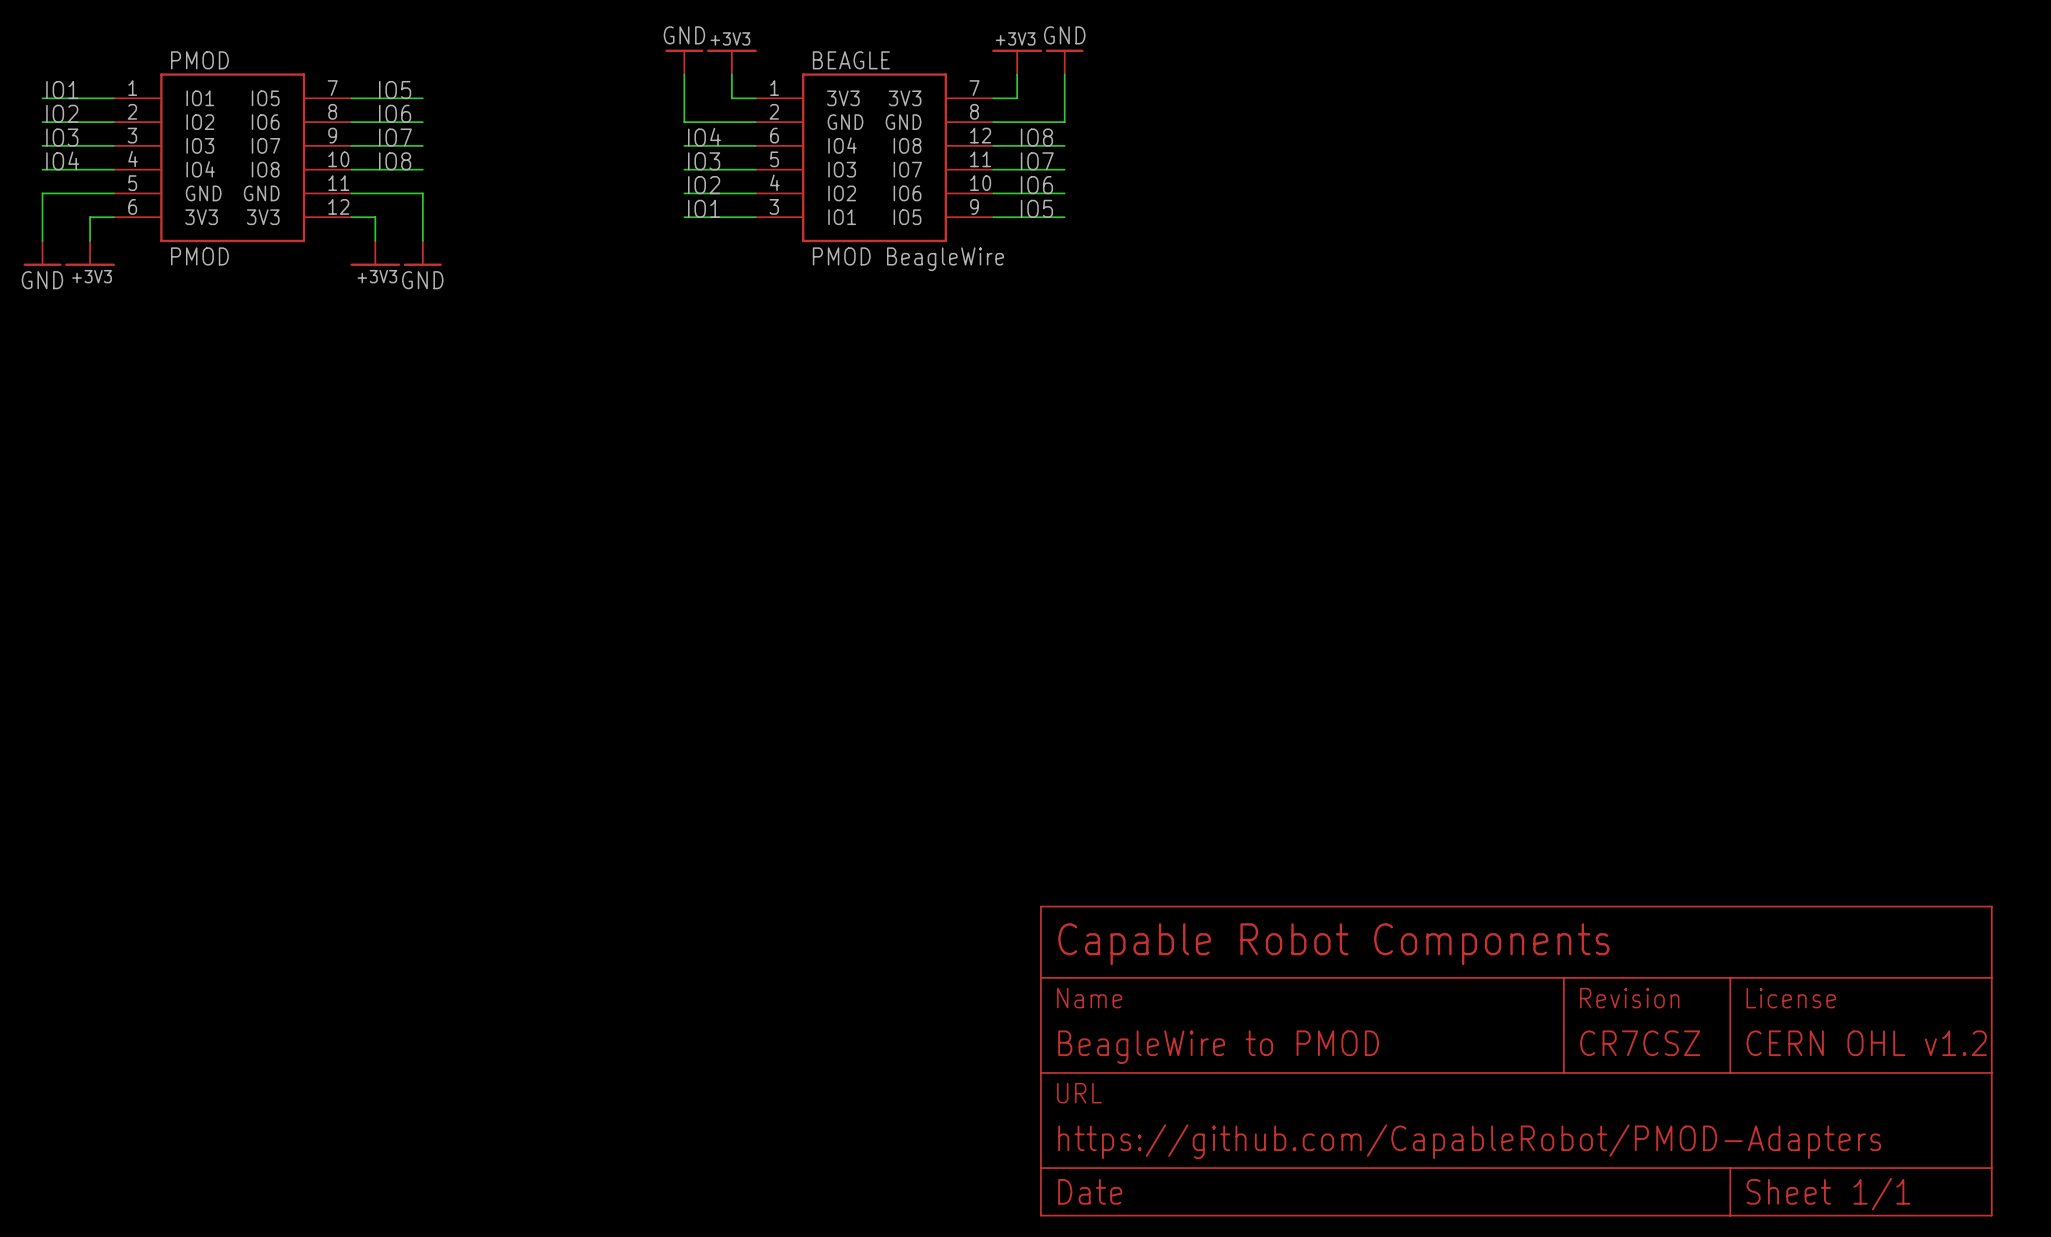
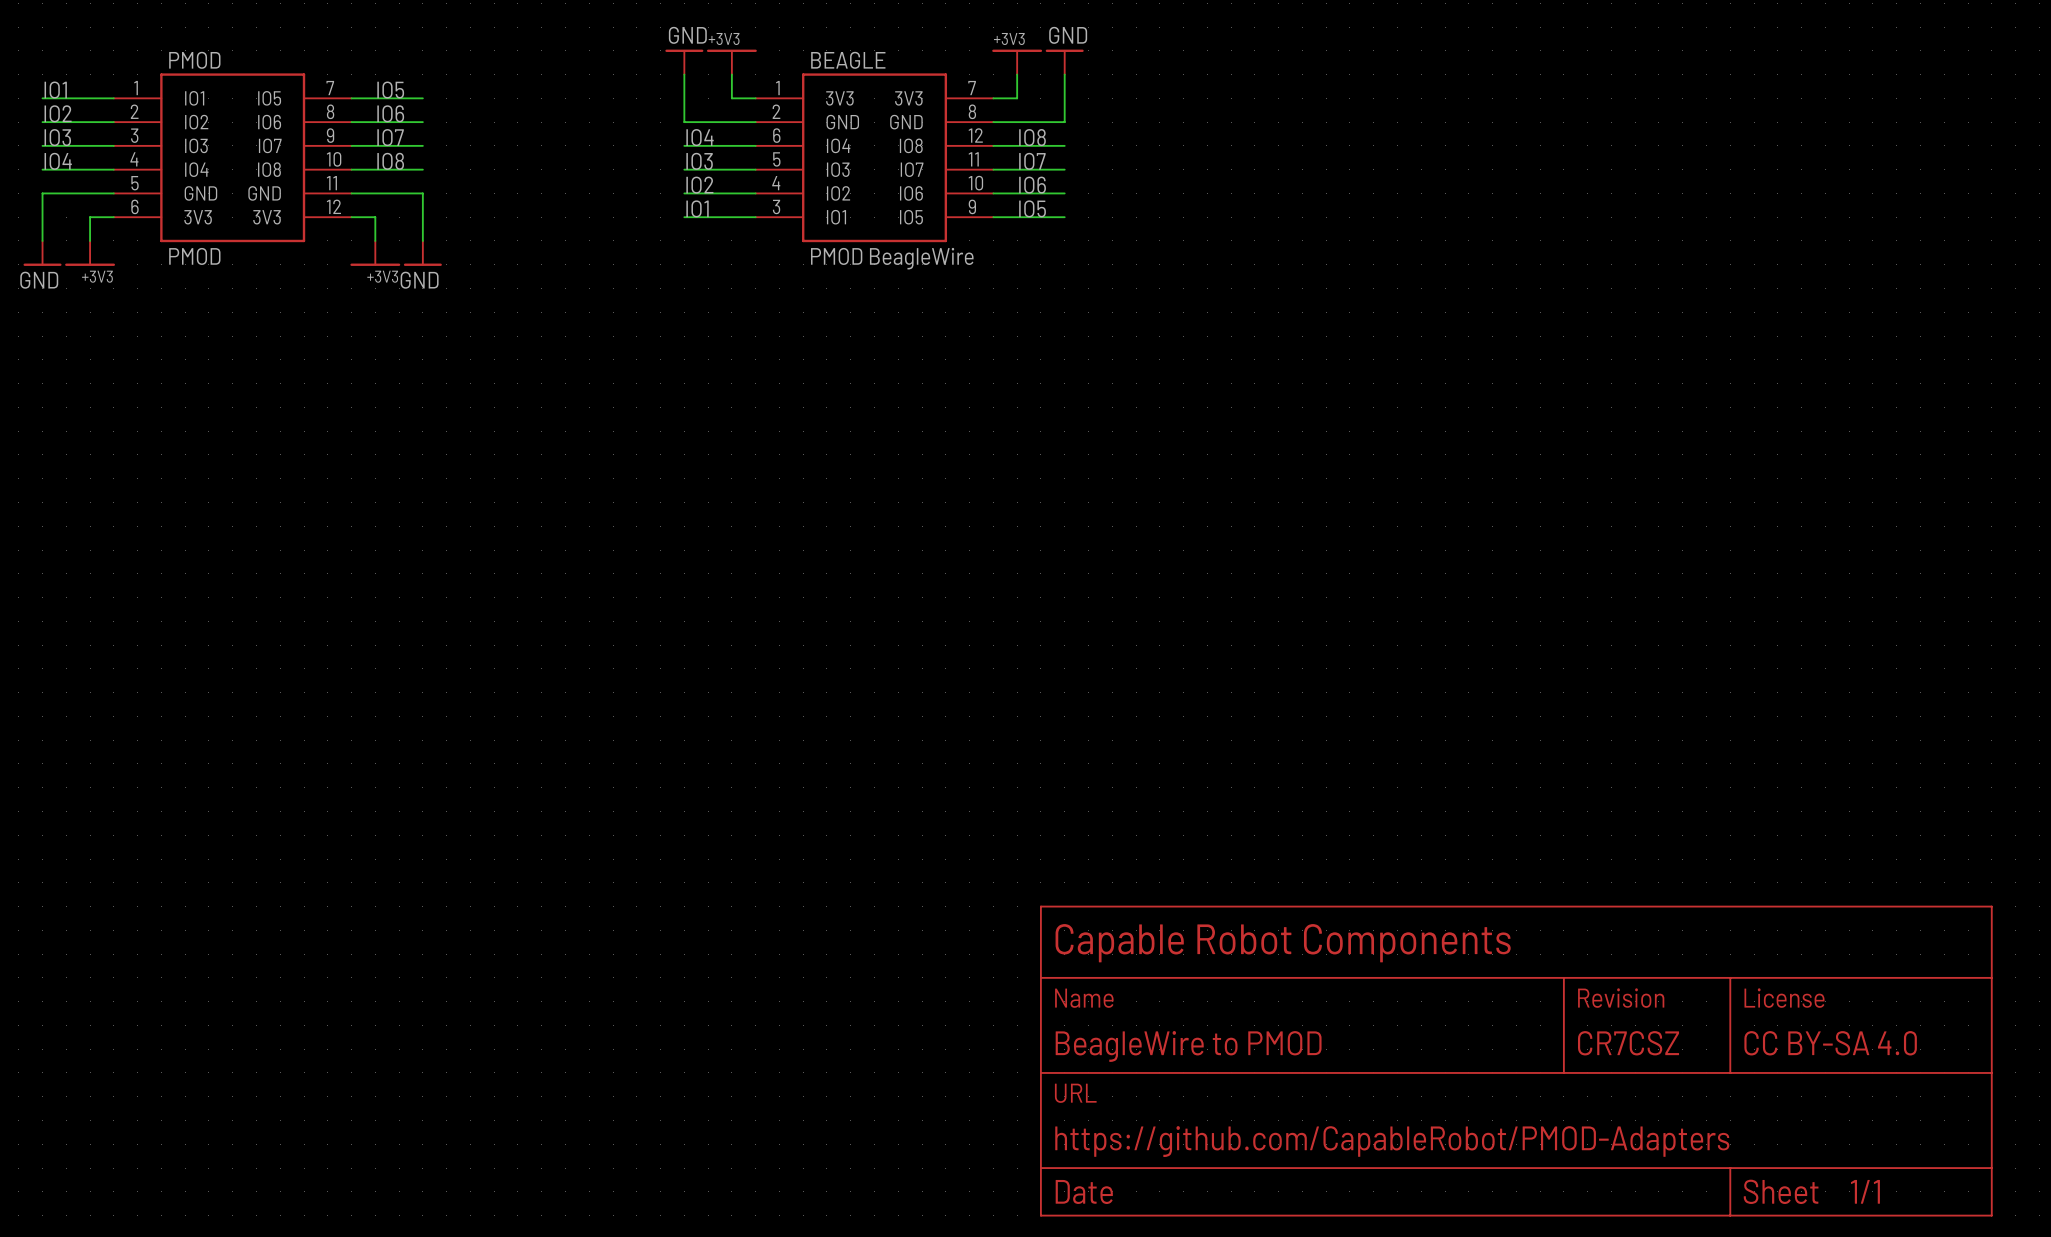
part text: CERN OHL v1.2 (1866, 1043) -> CC BY-SA 4.0 (1830, 1043)

